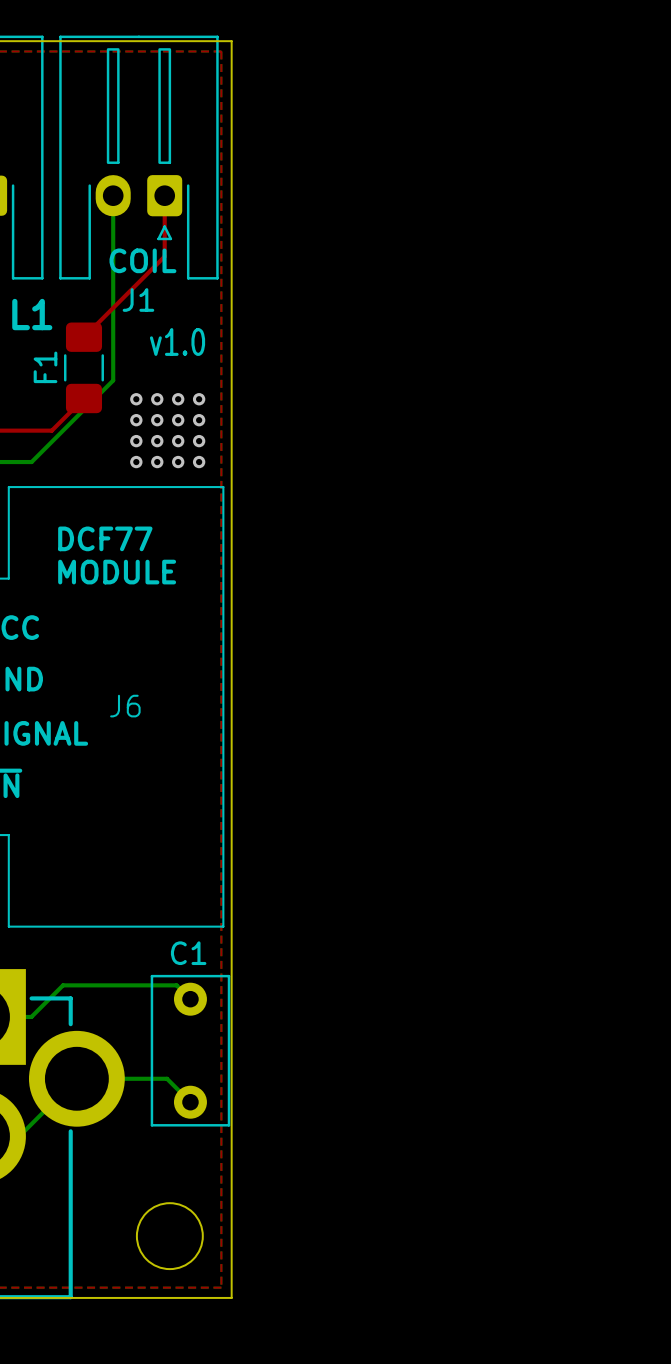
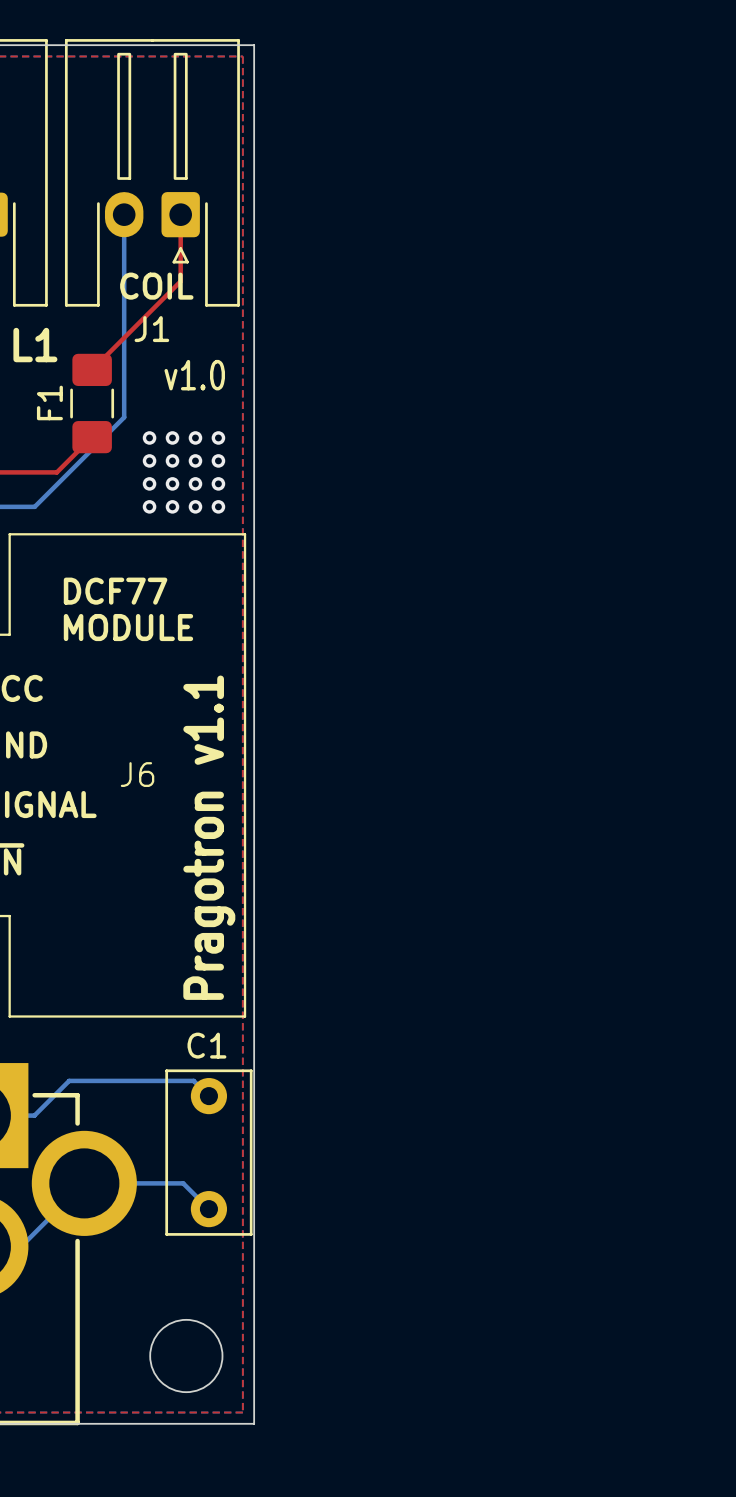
text: none -> Pragotron v1.1 (209, 837)

